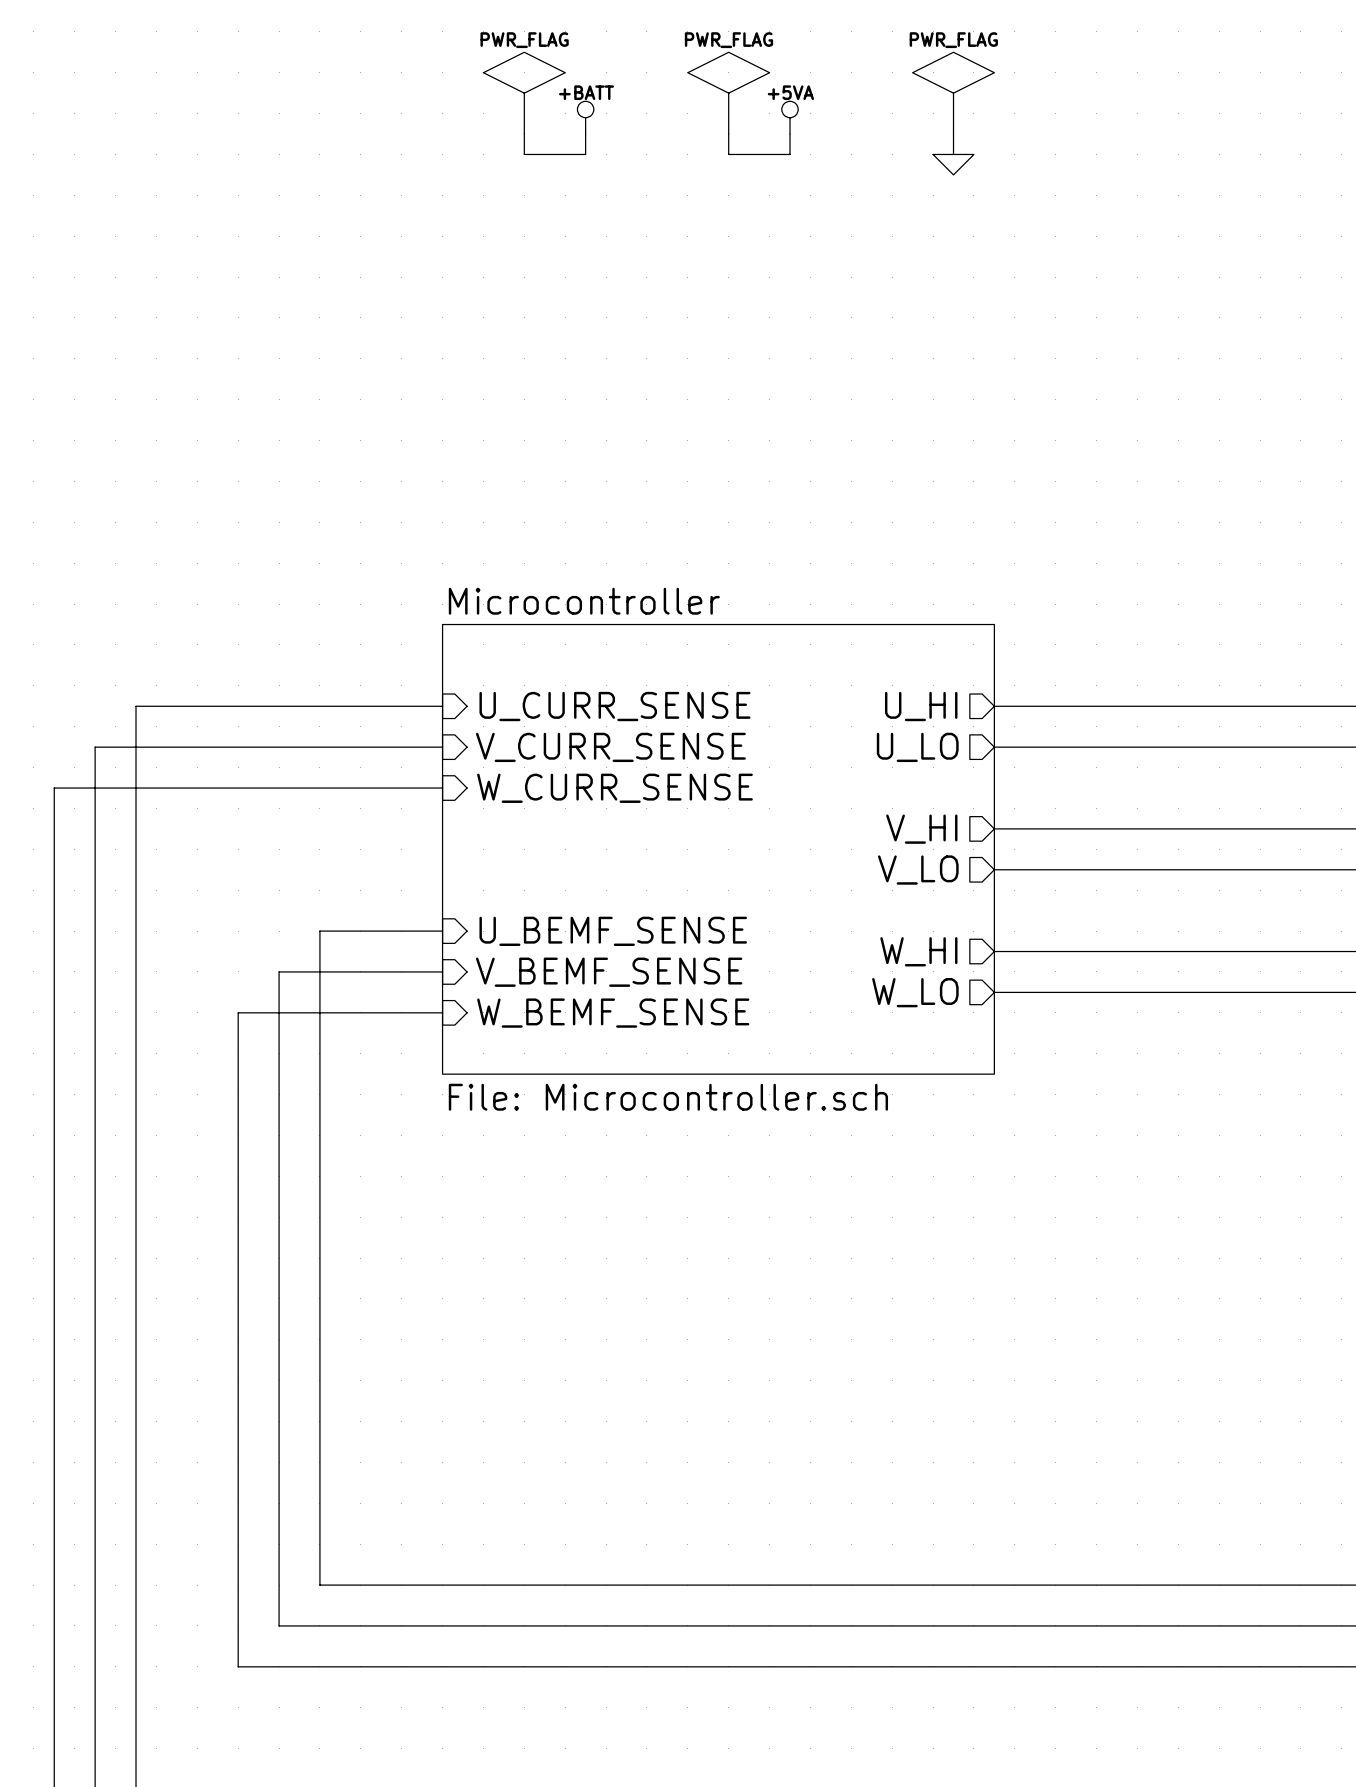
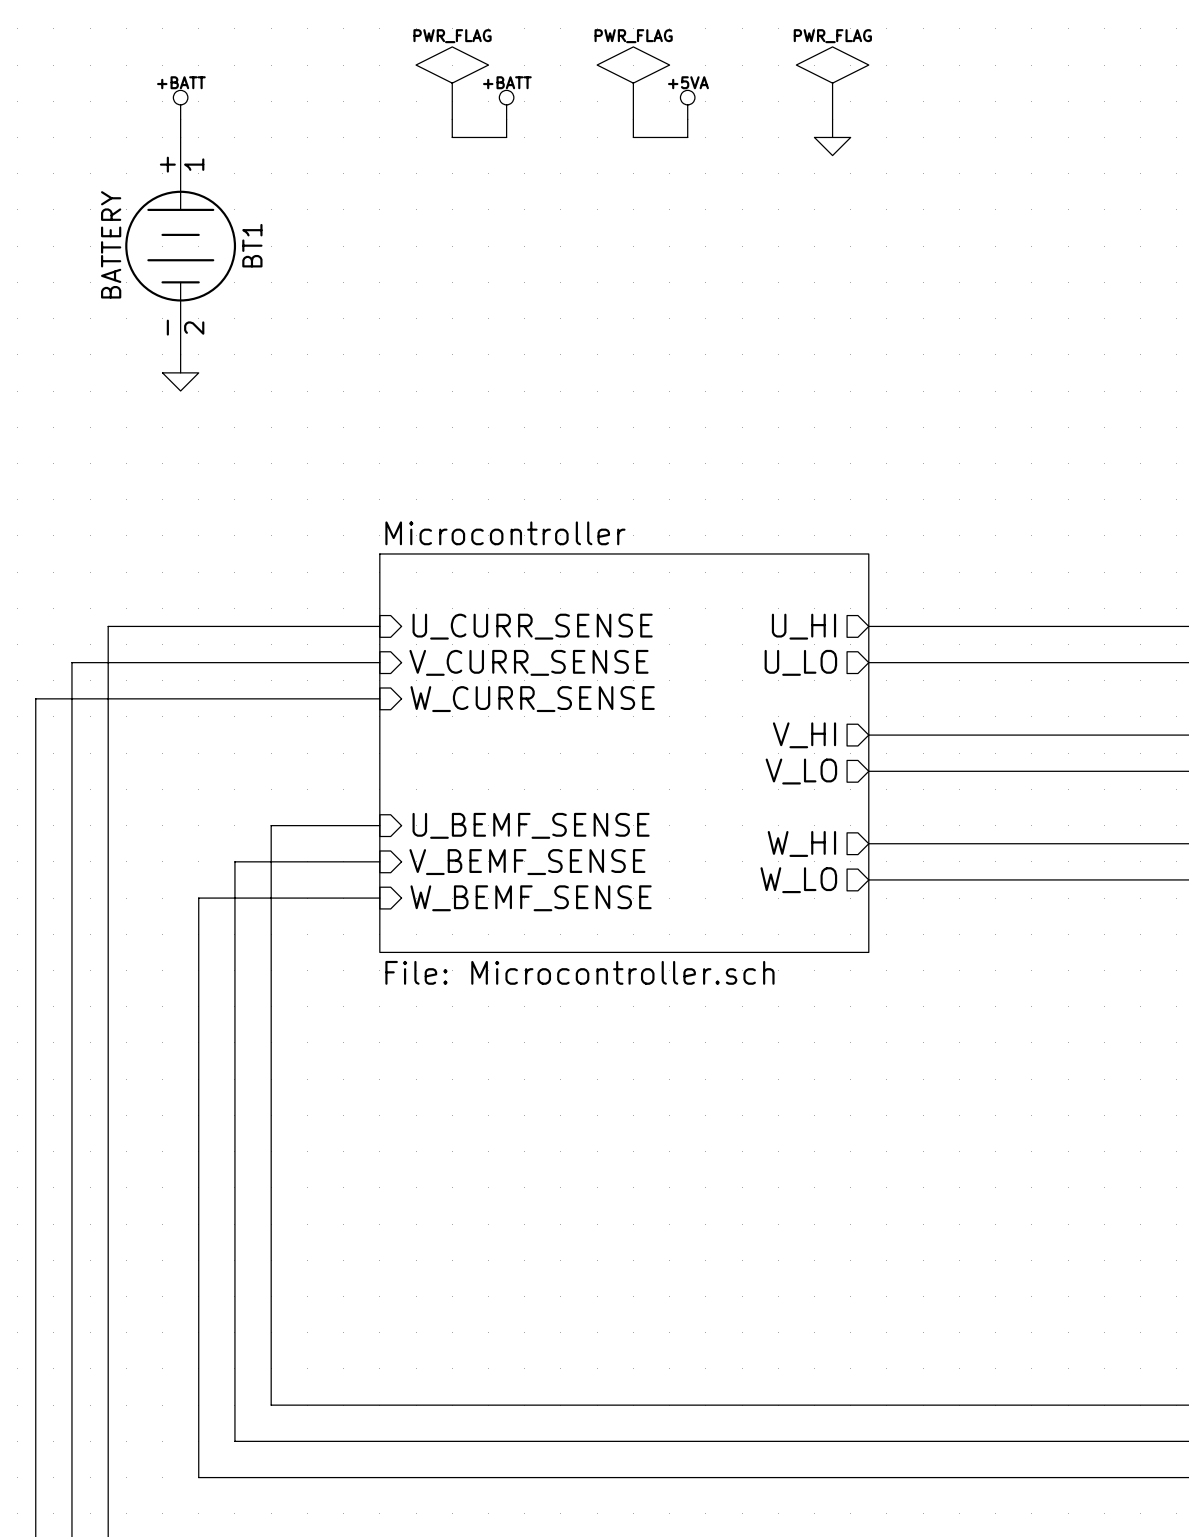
power symbol: none -> +BATT (180, 104)
wire: none -> (180, 119) (180, 137)
BT1: none -> BATTERY (180, 246)
wire: none -> (180, 354) (180, 372)
power symbol: none -> (180, 381)

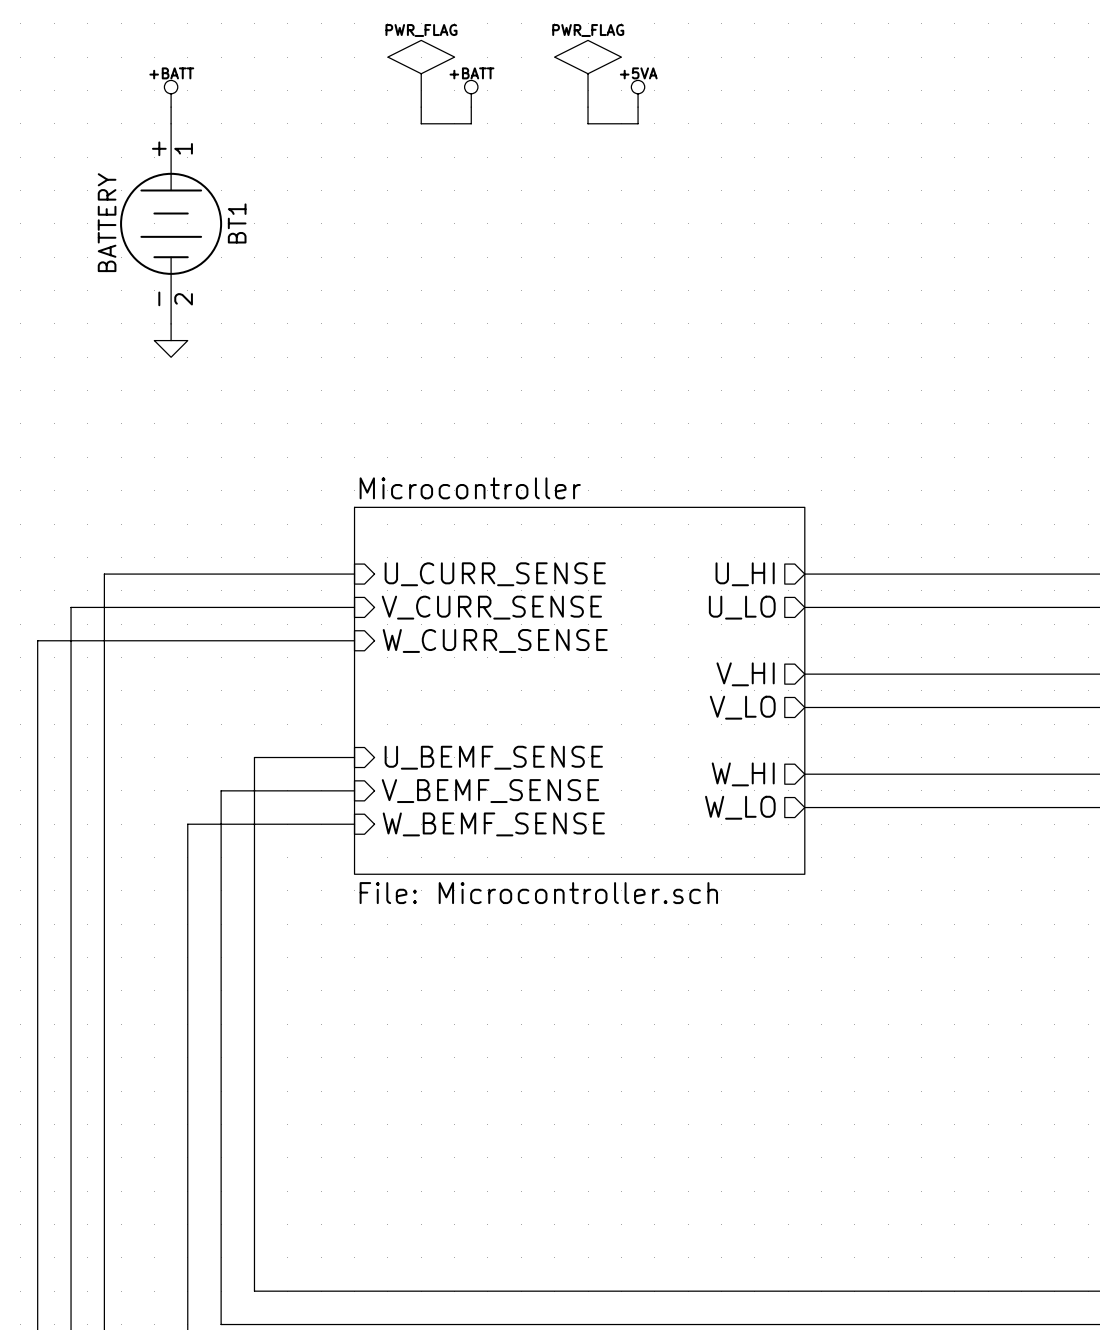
power symbol: PWR_FLAG (832, 83) -> none
wire: (832, 119) (832, 137) -> none
power symbol: (832, 146) -> none

